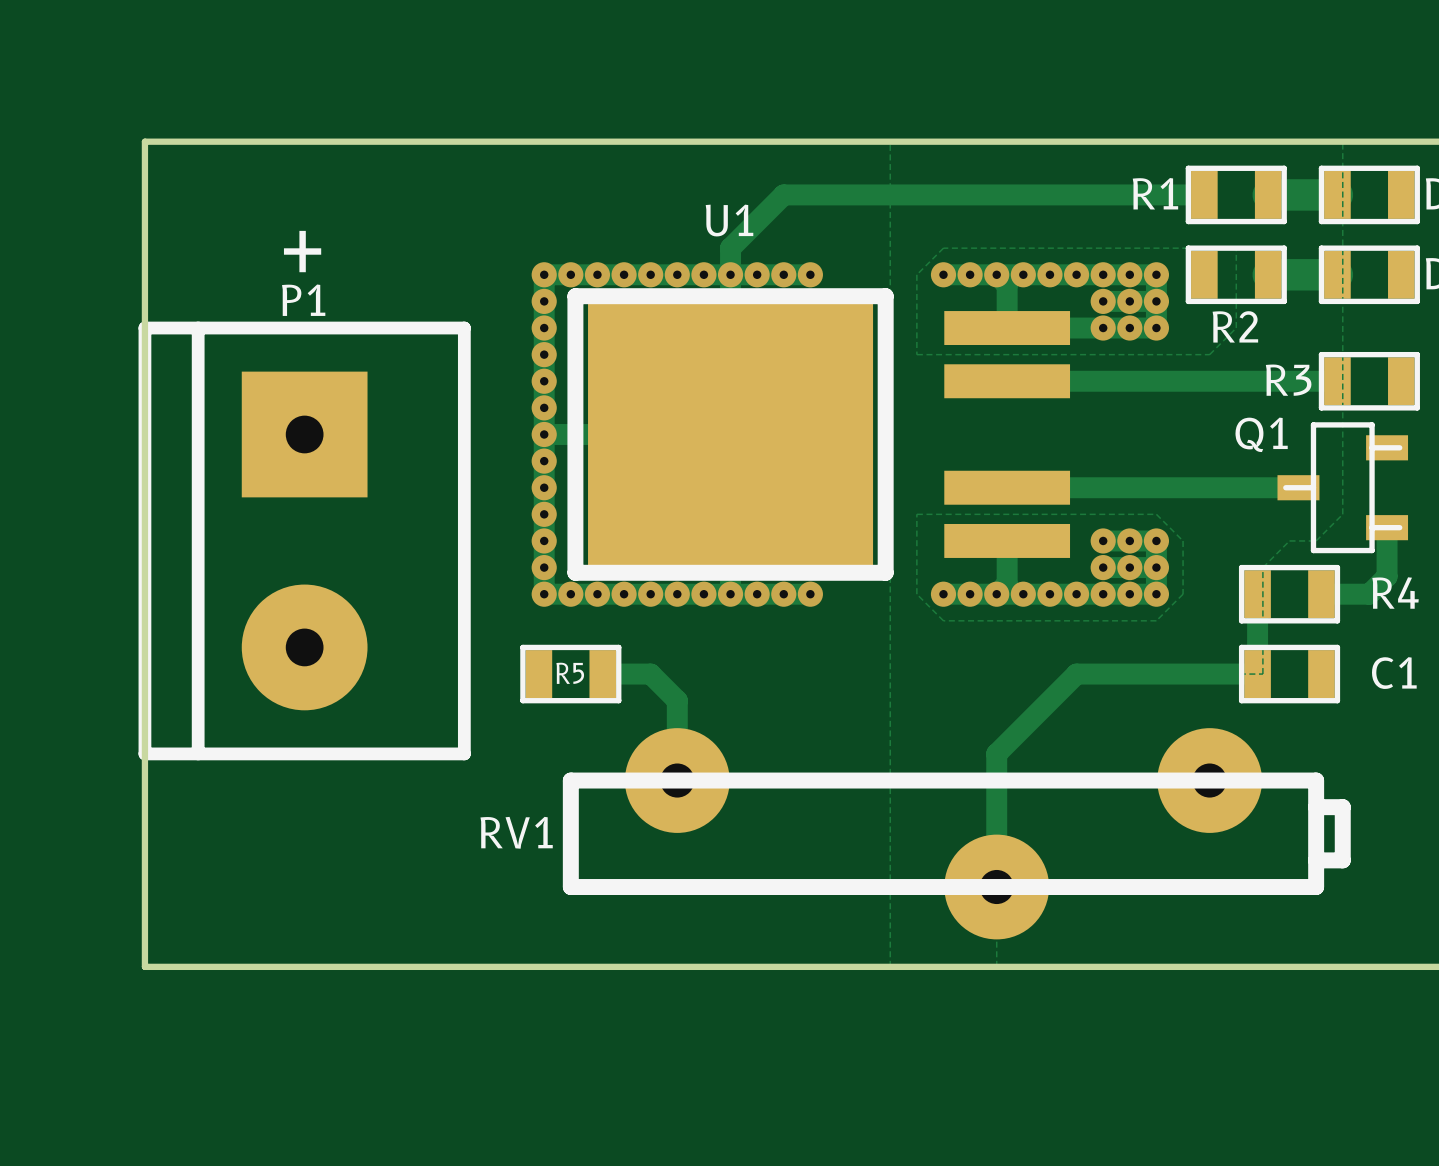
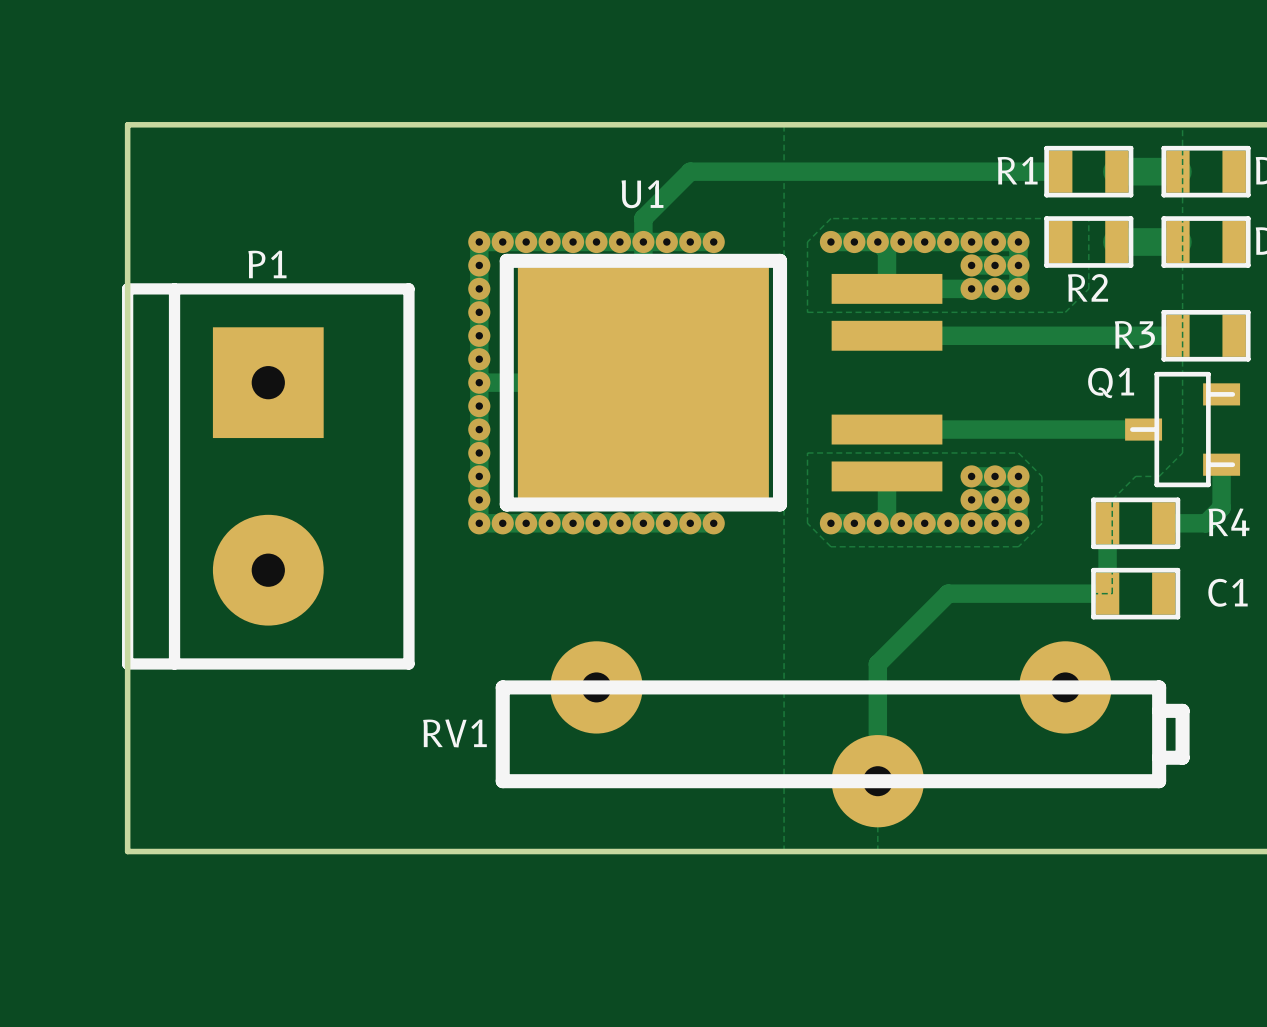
text: + (302, 251) -> none
R5: (570, 674) -> none
track: (602, 674) (650, 674) (677, 700) (677, 780) -> none

